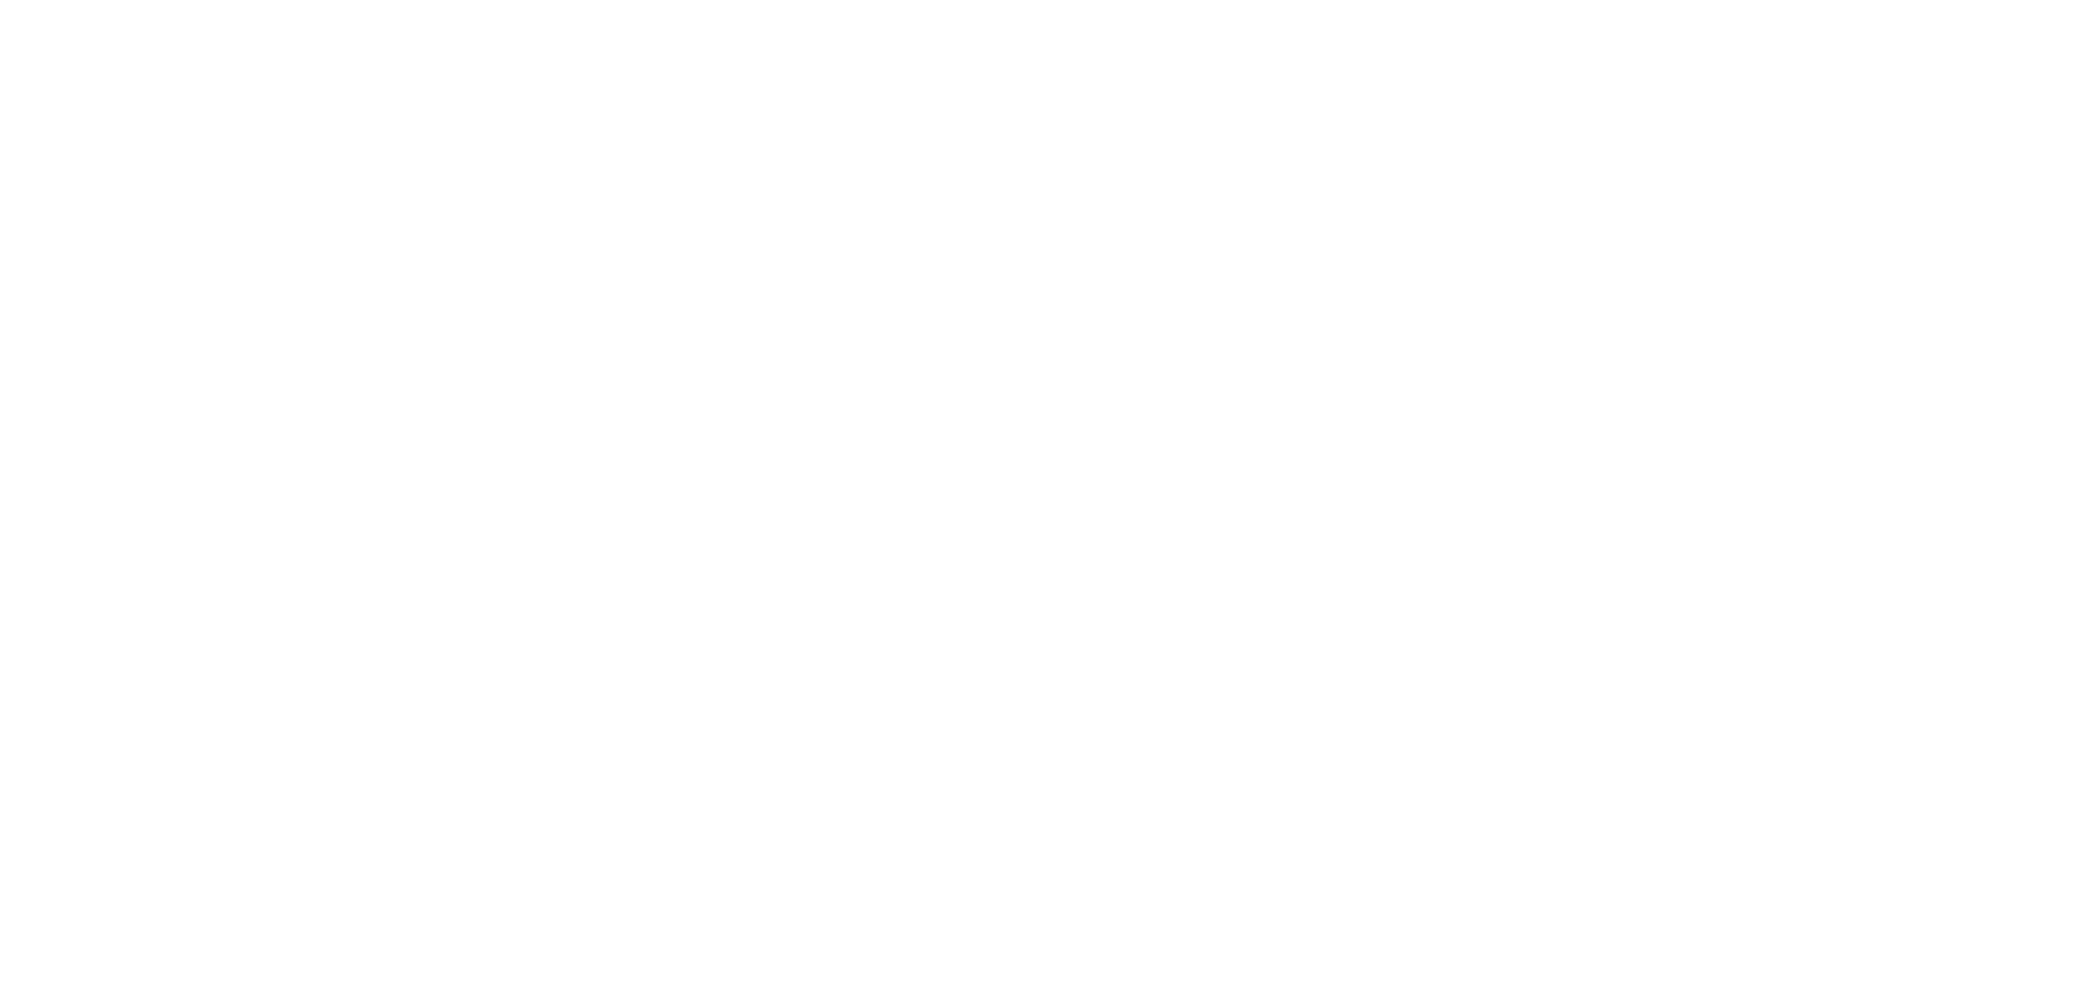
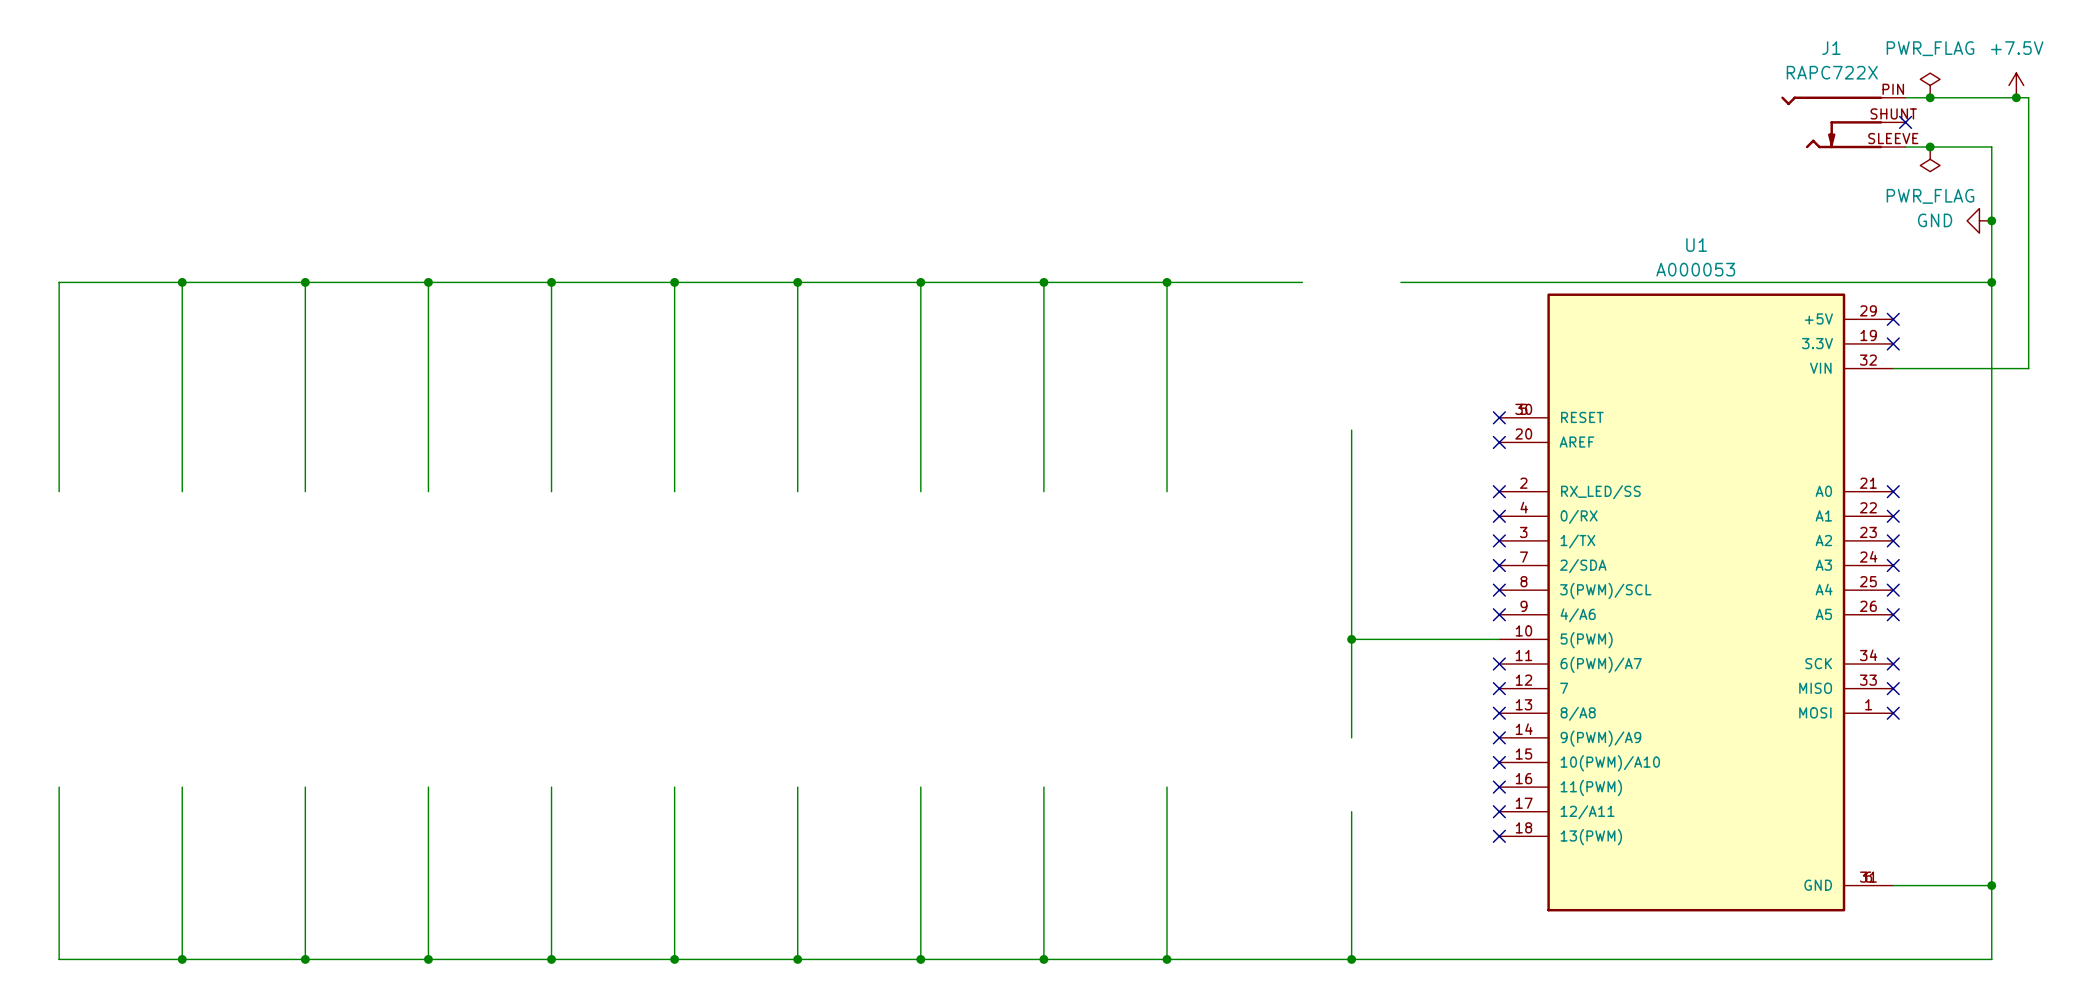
power symbol: none -> PWR_FLAG (1930, 85)
power symbol: none -> +7.5V (2016, 85)
wire: none -> (1905, 97) (2028, 97) (2028, 368) (1893, 368)
junction: none -> (1930, 97)
junction: none -> (2016, 97)
J1: none -> RAPC722X (1843, 122)
no-connect mark: none -> (1905, 122)
wire: none -> (1905, 147) (1991, 147) (1991, 959) (59, 959) (59, 787)
junction: none -> (1930, 147)
power symbol: none -> PWR_FLAG (1930, 159)
power symbol: none -> GND (1979, 220)
junction: none -> (1991, 220)
wire: none -> (182, 282) (182, 491)
junction: none -> (182, 282)
wire: none -> (305, 282) (305, 491)
junction: none -> (305, 282)
wire: none -> (428, 282) (428, 491)
junction: none -> (428, 282)
wire: none -> (551, 282) (551, 491)
junction: none -> (551, 282)
wire: none -> (674, 282) (674, 491)
junction: none -> (674, 282)
wire: none -> (797, 282) (797, 491)
junction: none -> (797, 282)
wire: none -> (920, 282) (920, 491)
junction: none -> (920, 282)
wire: none -> (1043, 282) (1043, 491)
junction: none -> (1043, 282)
wire: none -> (1167, 282) (1167, 491)
junction: none -> (1167, 282)
wire: none -> (1302, 282) (59, 282) (59, 491)
wire: none -> (1400, 282) (1991, 282)
junction: none -> (1991, 282)
no-connect mark: none -> (1893, 319)
no-connect mark: none -> (1893, 343)
no-connect mark: none -> (1499, 417)
wire: none -> (1351, 430) (1351, 737)
no-connect mark: none -> (1499, 442)
no-connect mark: none -> (1499, 491)
no-connect mark: none -> (1893, 491)
no-connect mark: none -> (1499, 516)
no-connect mark: none -> (1893, 516)
no-connect mark: none -> (1499, 540)
no-connect mark: none -> (1893, 540)
no-connect mark: none -> (1499, 565)
no-connect mark: none -> (1893, 565)
no-connect mark: none -> (1499, 590)
no-connect mark: none -> (1893, 590)
U1: none -> A000053 (1696, 602)
no-connect mark: none -> (1499, 614)
no-connect mark: none -> (1893, 614)
wire: none -> (1351, 639) (1499, 639)
junction: none -> (1351, 639)
no-connect mark: none -> (1499, 664)
no-connect mark: none -> (1893, 664)
no-connect mark: none -> (1499, 688)
no-connect mark: none -> (1893, 688)
no-connect mark: none -> (1499, 713)
no-connect mark: none -> (1893, 713)
no-connect mark: none -> (1499, 737)
no-connect mark: none -> (1499, 762)
wire: none -> (182, 787) (182, 959)
wire: none -> (305, 787) (305, 959)
wire: none -> (428, 787) (428, 959)
wire: none -> (551, 787) (551, 959)
wire: none -> (674, 787) (674, 959)
wire: none -> (797, 787) (797, 959)
wire: none -> (920, 787) (920, 959)
wire: none -> (1043, 787) (1043, 959)
wire: none -> (1167, 787) (1167, 959)
no-connect mark: none -> (1499, 787)
wire: none -> (1351, 811) (1351, 959)
no-connect mark: none -> (1499, 811)
no-connect mark: none -> (1499, 836)
wire: none -> (1893, 885) (1991, 885)
junction: none -> (1991, 885)
junction: none -> (182, 959)
junction: none -> (305, 959)
junction: none -> (428, 959)
junction: none -> (551, 959)
junction: none -> (674, 959)
junction: none -> (797, 959)
junction: none -> (920, 959)
junction: none -> (1043, 959)
junction: none -> (1167, 959)
junction: none -> (1351, 959)

